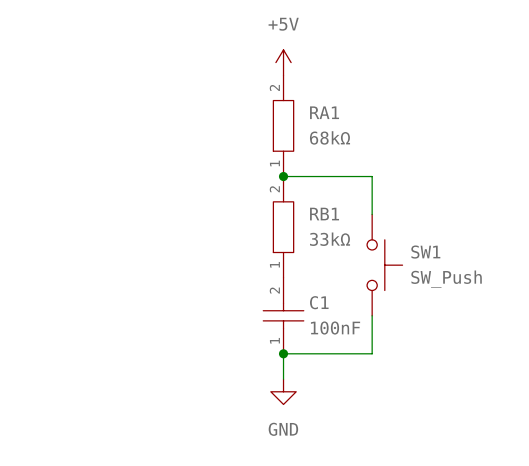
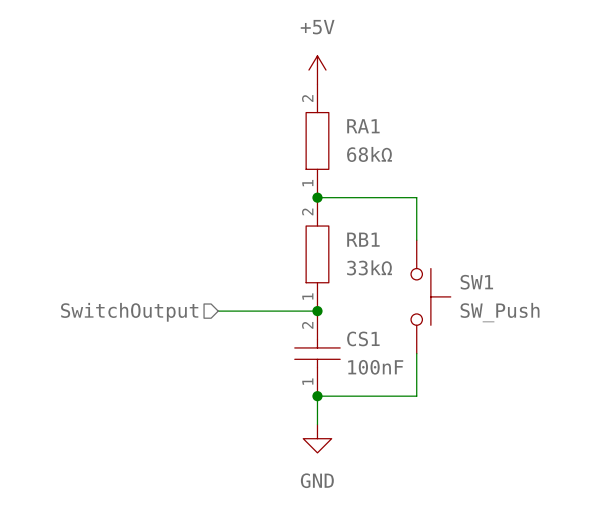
wire: none -> (218, 311) (317, 311)
junction: none -> (317, 311)
hierarchical label: none -> SwitchOutput (129, 312)
C1 name: C1 (319, 302) -> CS1 (363, 338)

